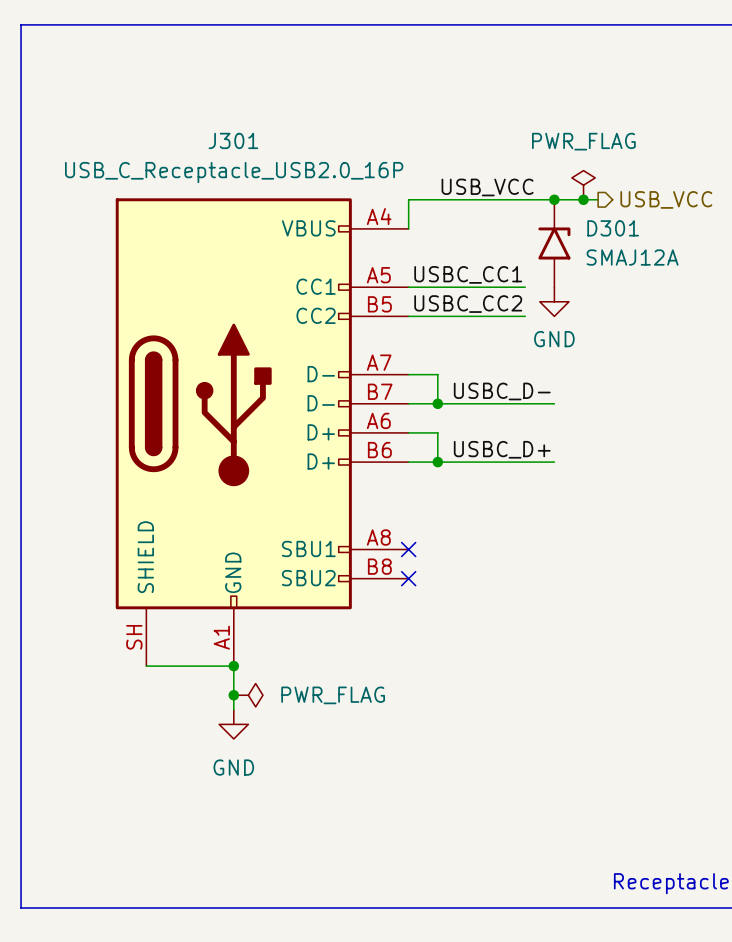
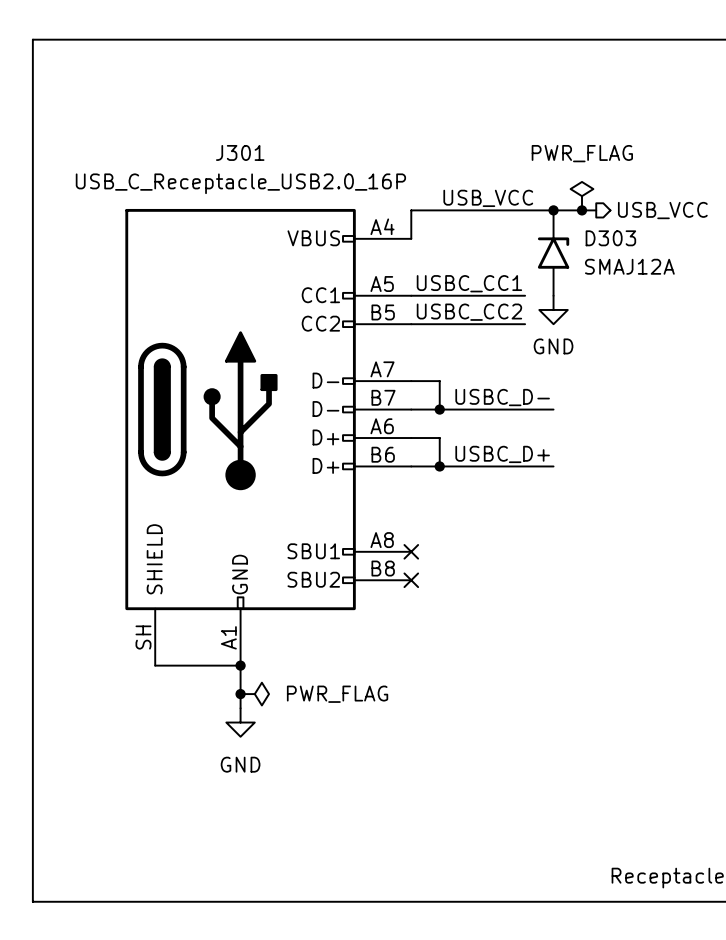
D301 name: D301 (613, 228) -> D303 (610, 238)

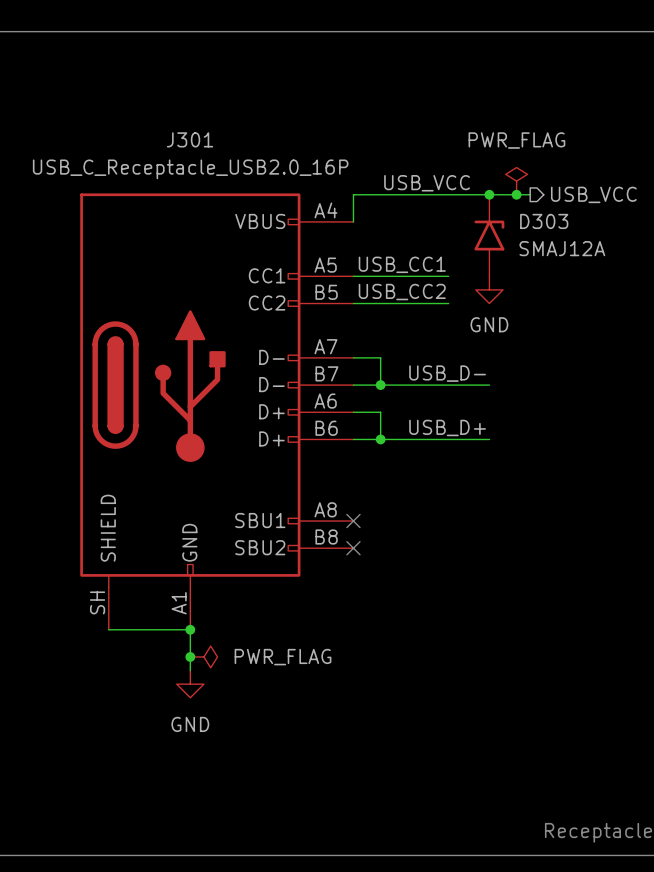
label: USBC_CC1 (469, 283) -> USB_CC1 (402, 264)
wire: (510, 295) (525, 295) -> none
label: USBC_CC2 (469, 312) -> USB_CC2 (402, 292)
wire: (510, 324) (525, 324) -> none
label: USBC_D- (502, 397) -> USB_D- (447, 373)
label: USBC_D+ (502, 454) -> USB_D+ (447, 427)

